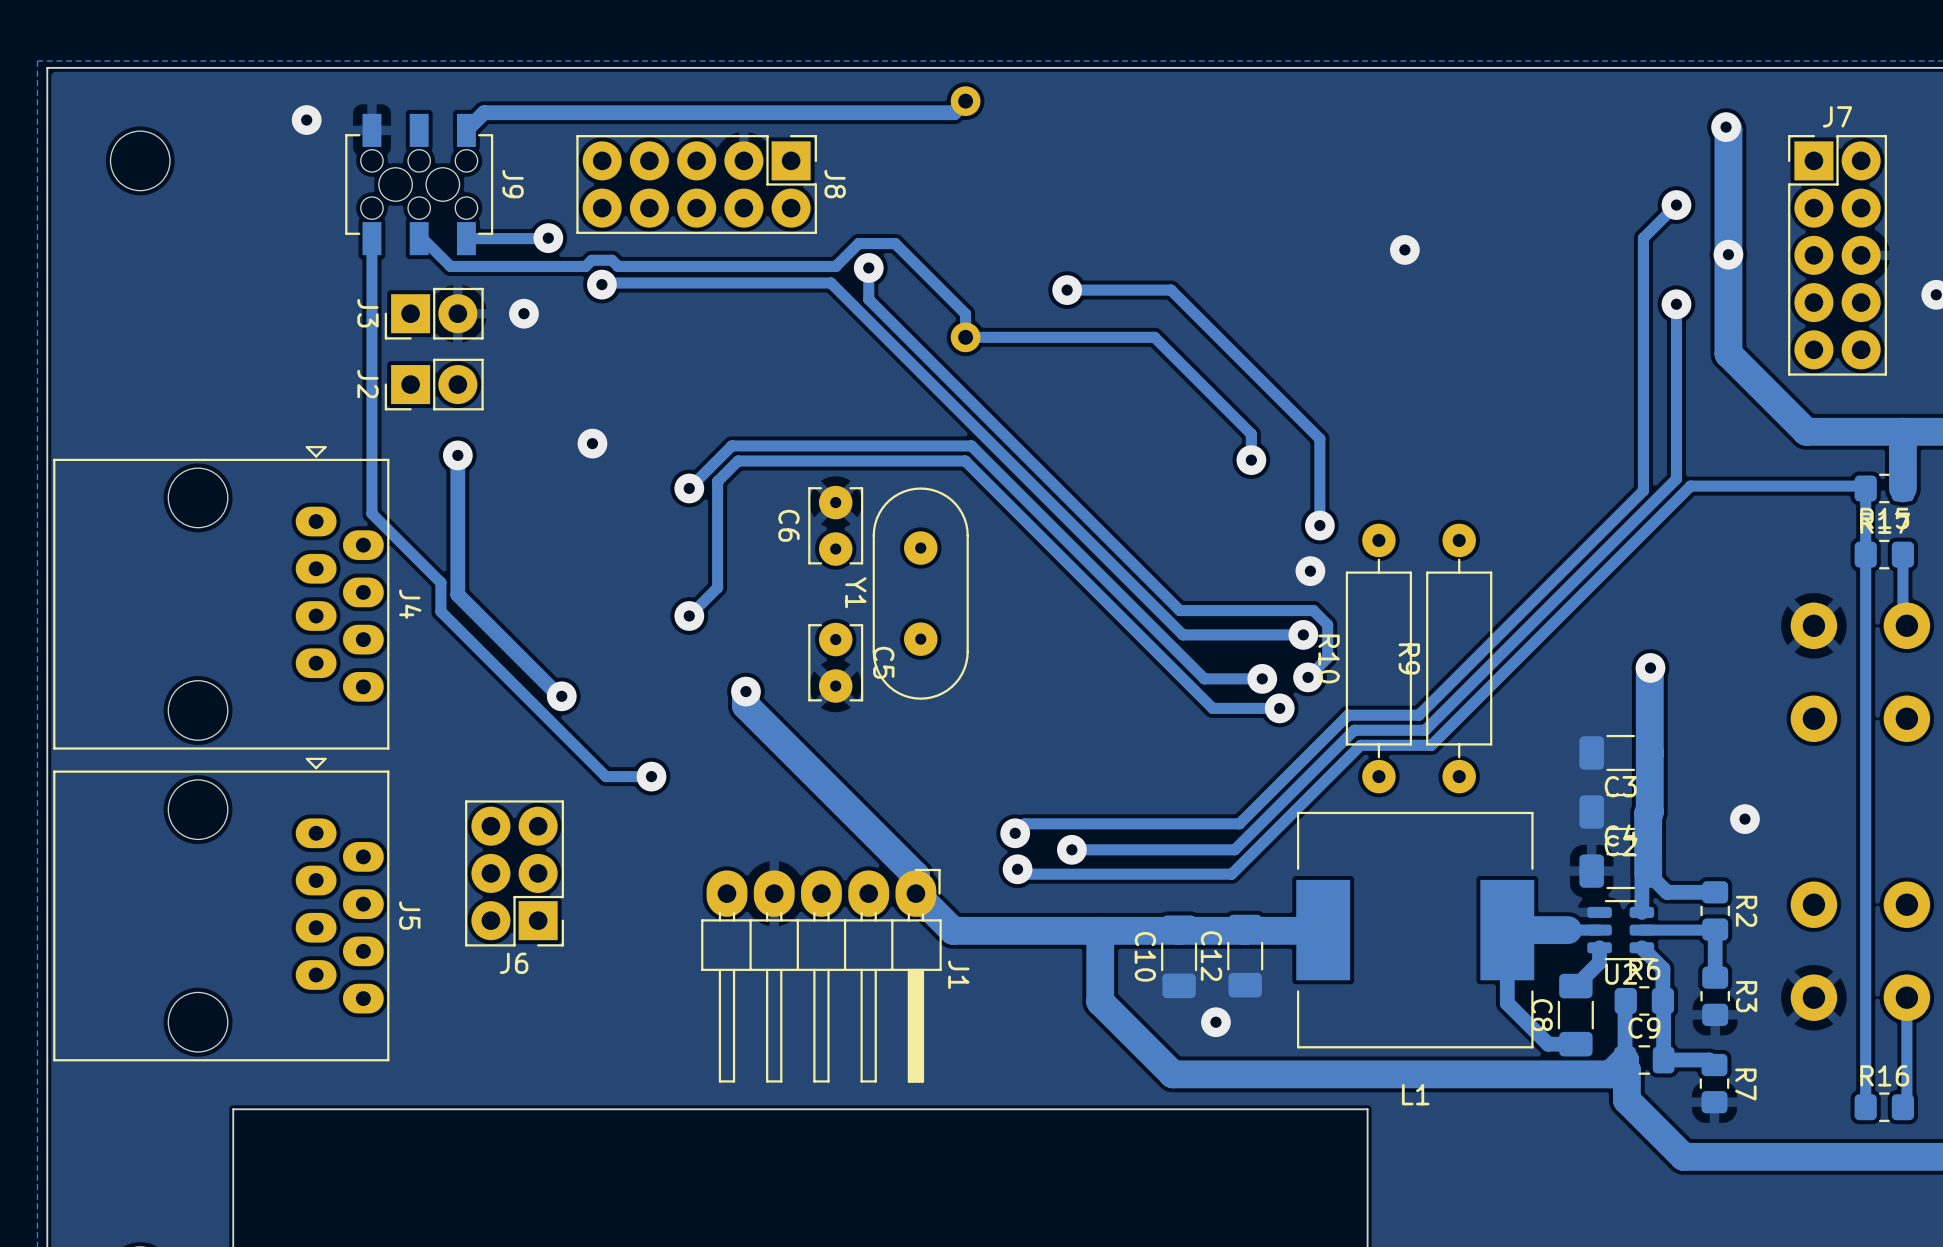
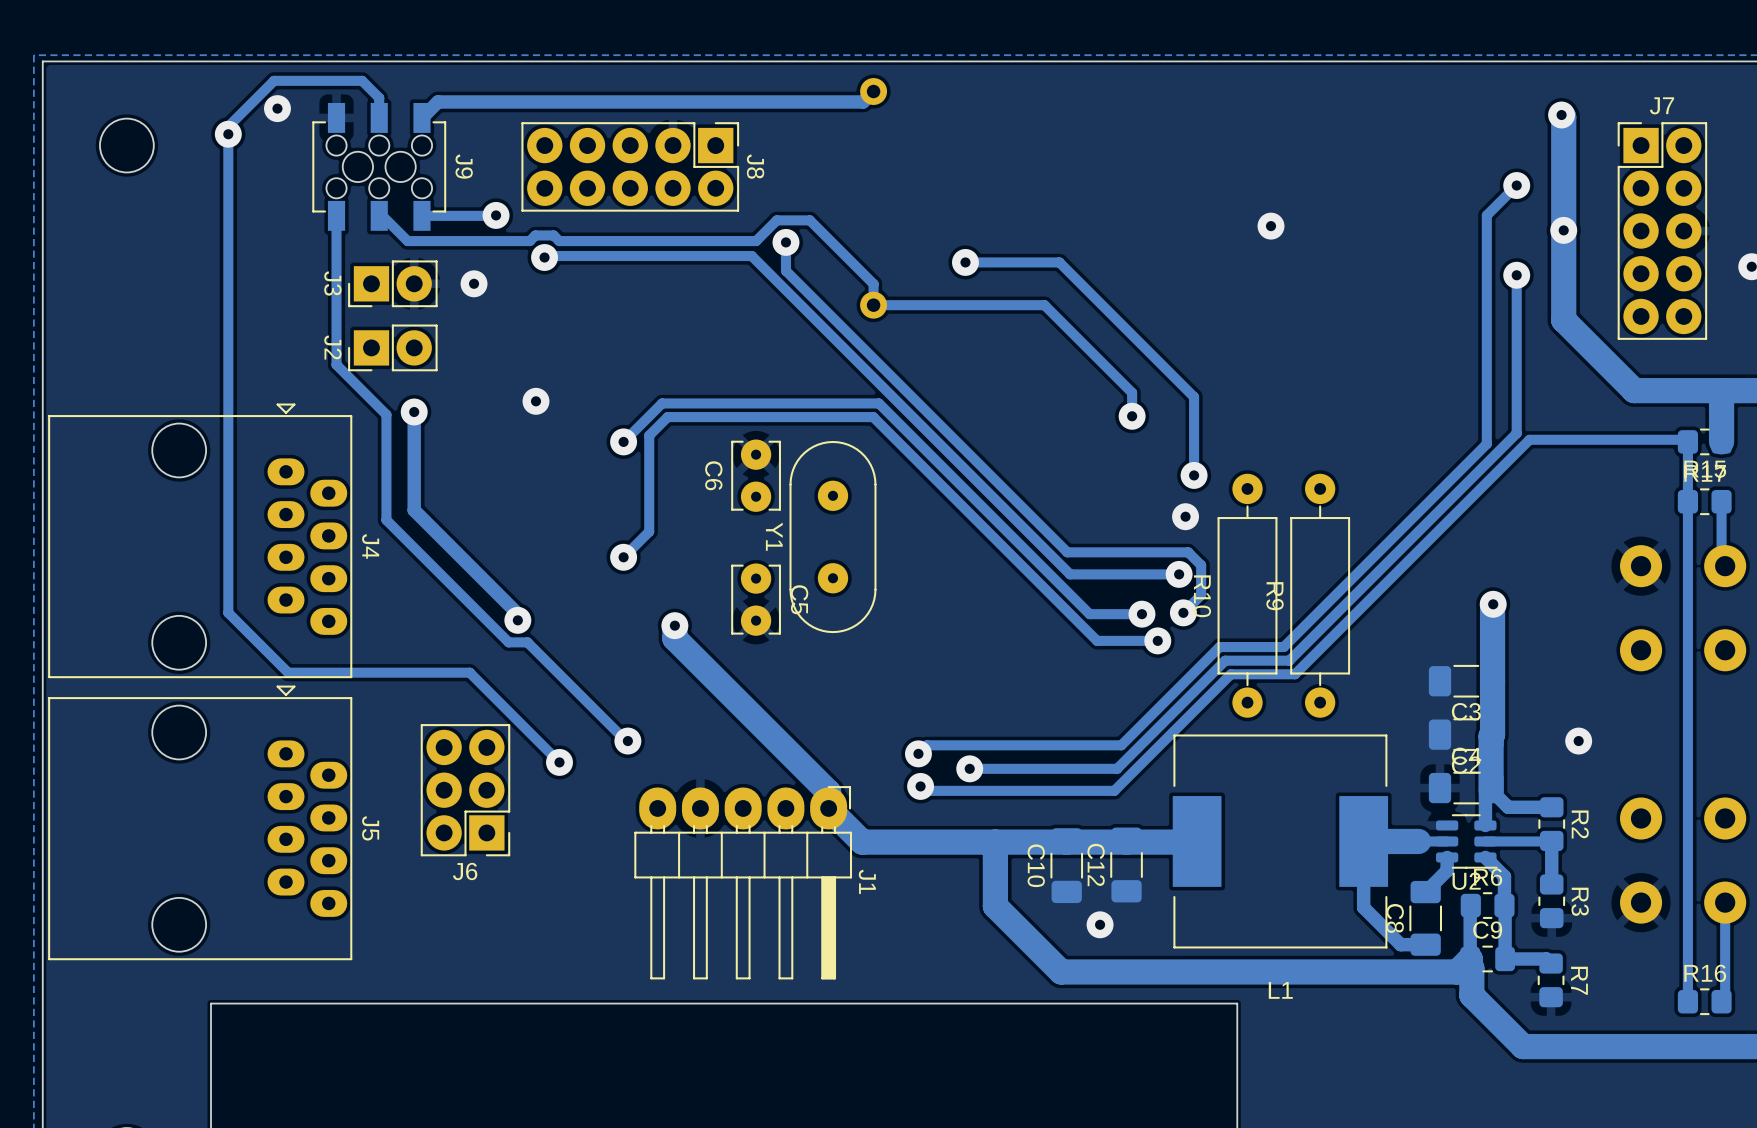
track: none -> (379, 117) (379, 97) (362, 80) (274, 80) (228, 126) (228, 612) (288, 672) (469, 672) (559, 762)
via: none -> (228, 134)
track: (371, 403) (371, 513) (440, 582) (440, 611) (605, 776) (651, 776) -> (336, 364) (386, 414) (386, 520) (508, 642) (527, 642) (627, 741)
track: (457, 564) (457, 594) (559, 696) (561, 696) -> (414, 510) (517, 613) (517, 620)
via position: (561, 696) -> (517, 620)
via: (651, 776) -> none
via: none -> (627, 741)
via: none -> (559, 762)

